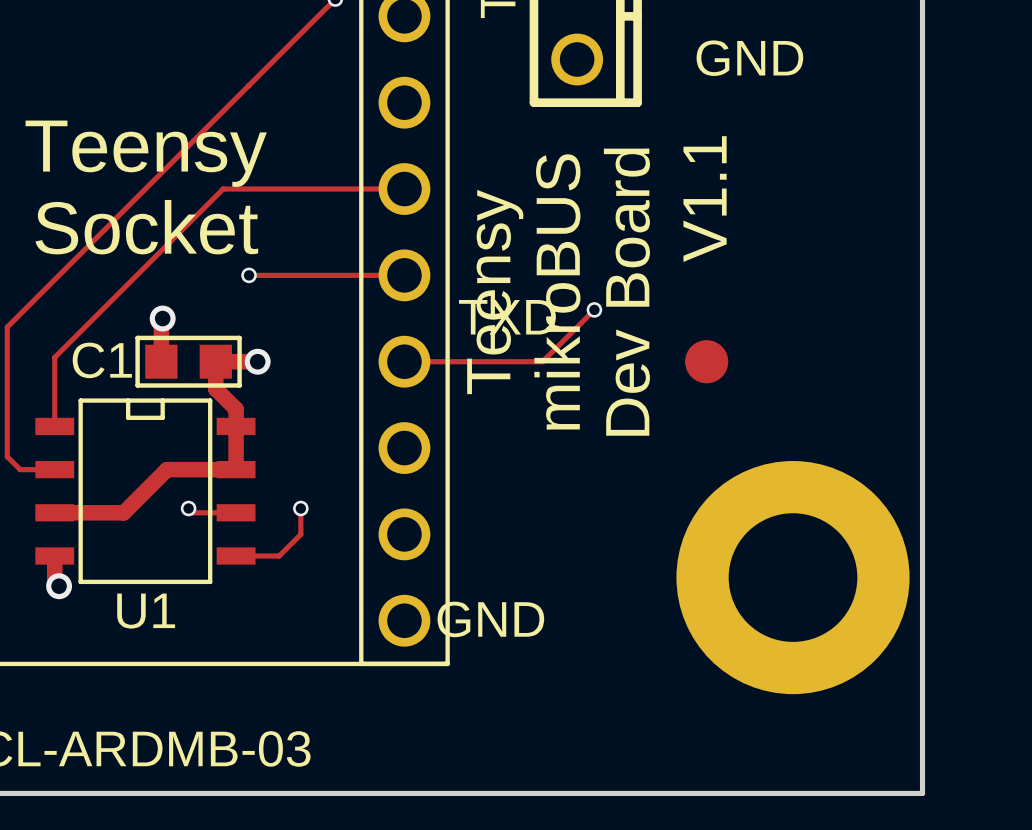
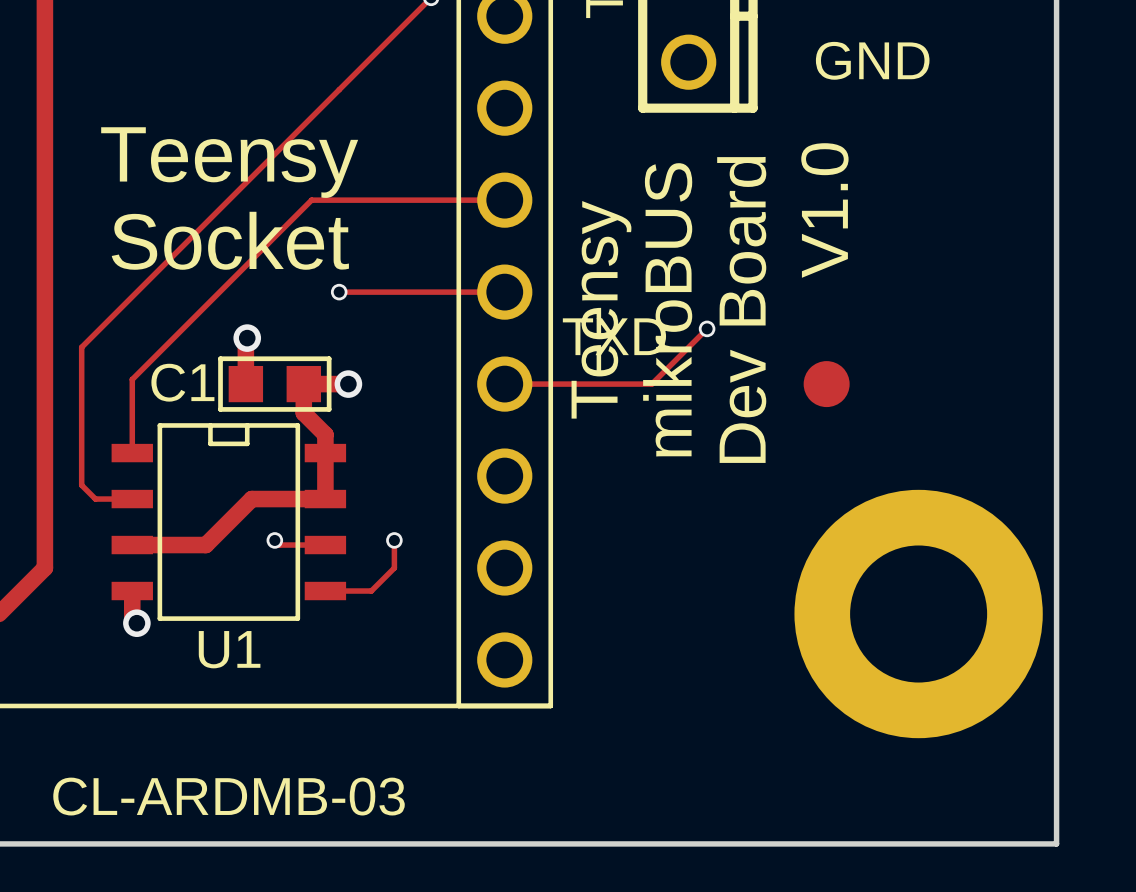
text: V1.1 (705, 199) -> V1.0 (824, 210)
text: GND (490, 619) -> none

